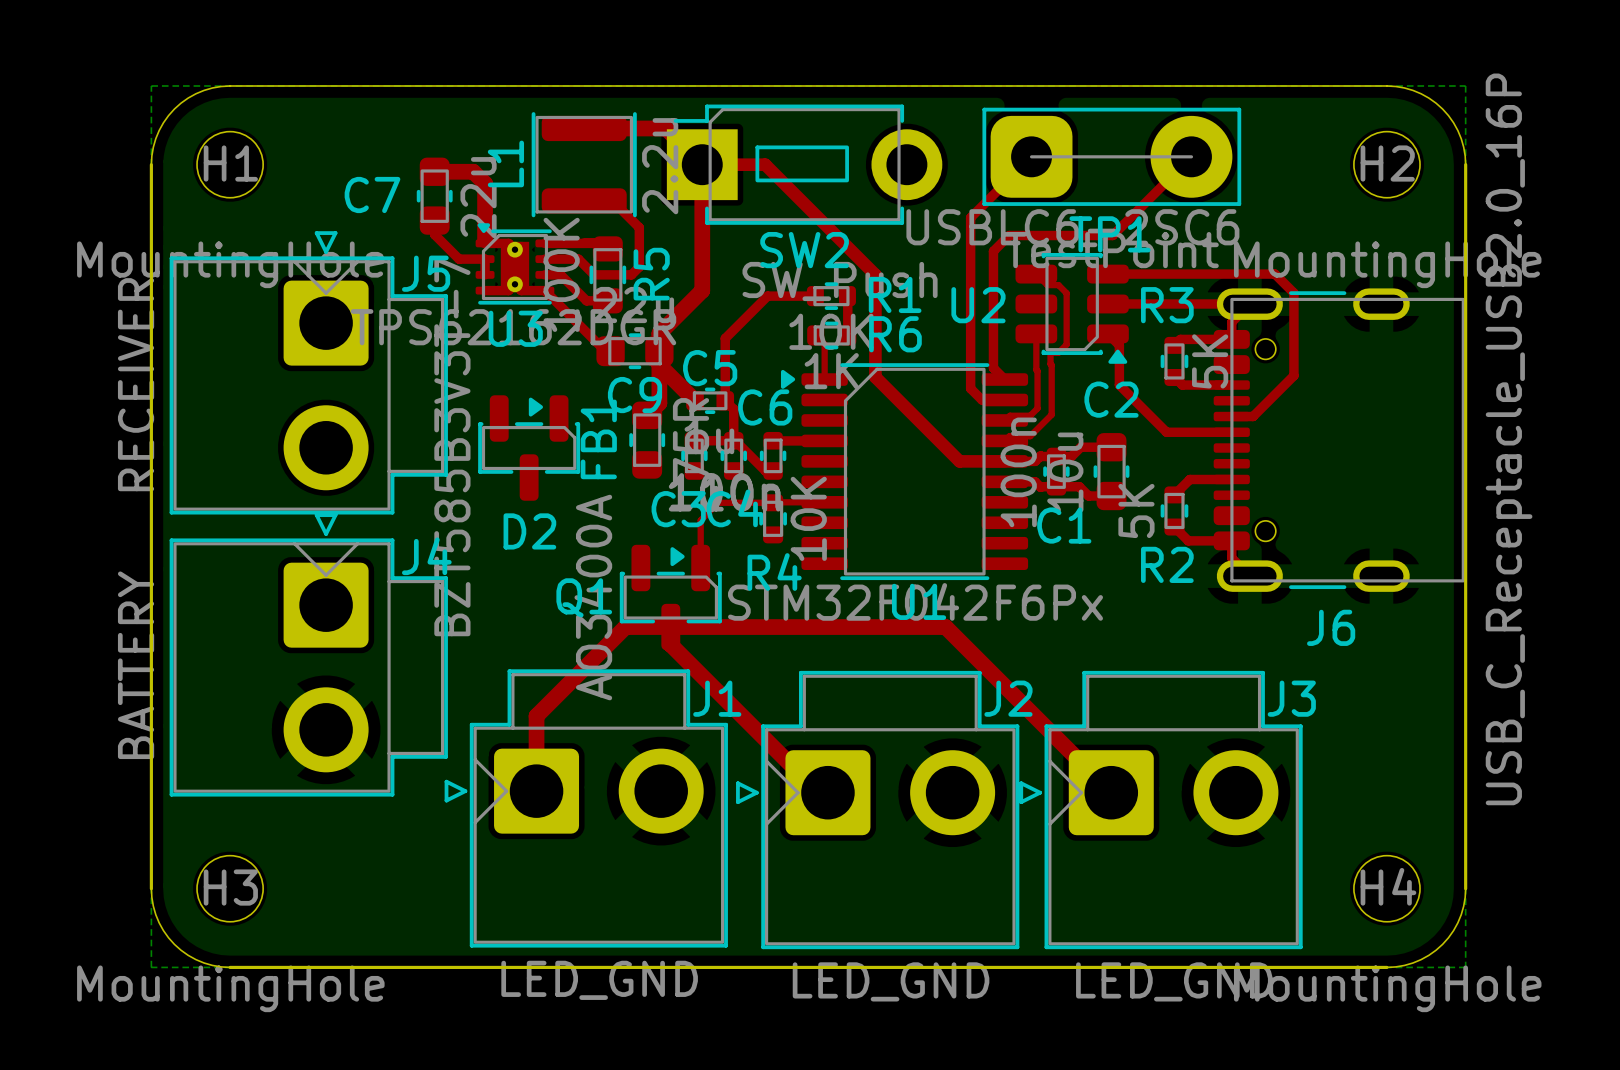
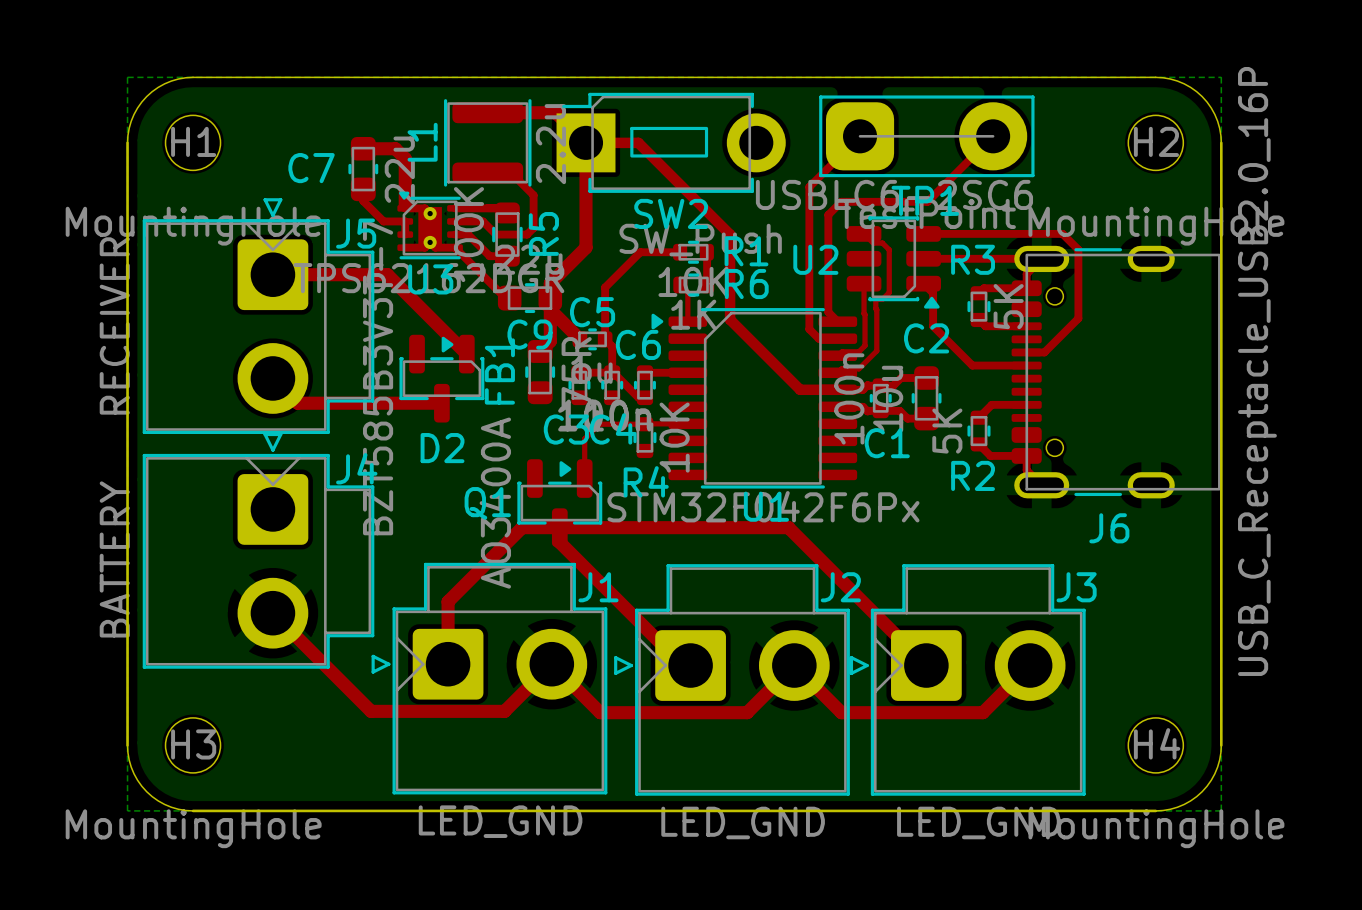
top track: none -> (272, 274) (387, 274) (466, 354)
top track: none -> (272, 378) (297, 403) (441, 403)
top track: none -> (272, 613) (371, 711) (504, 711) (551, 664) (600, 712) (747, 712) (794, 665) (841, 712) (982, 712) (1030, 665)

